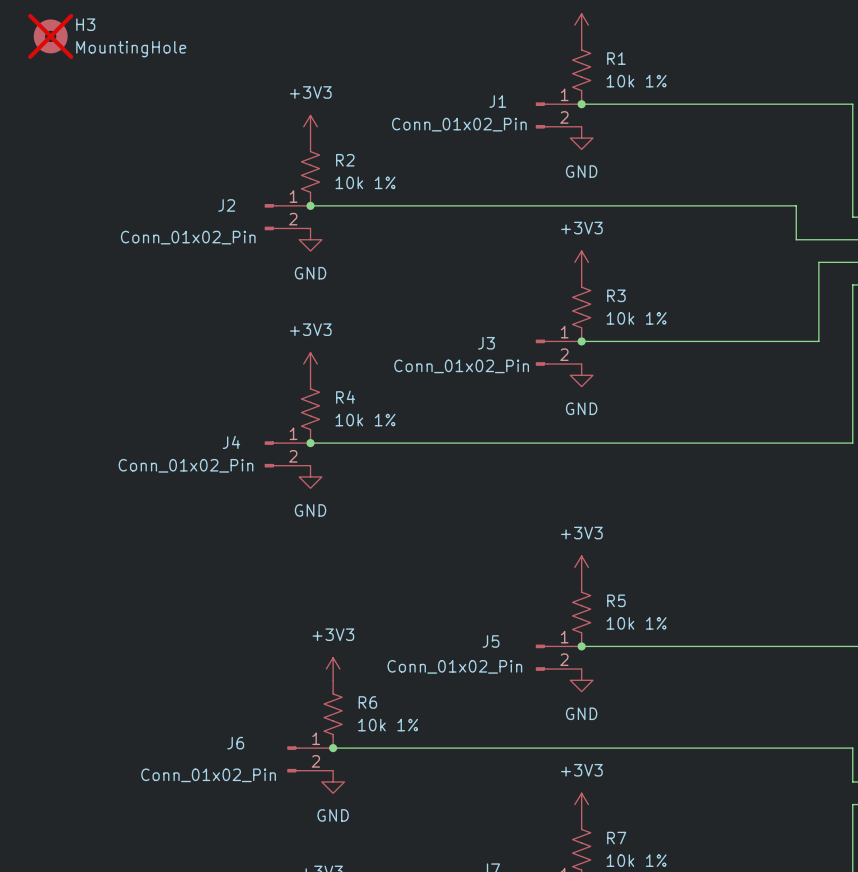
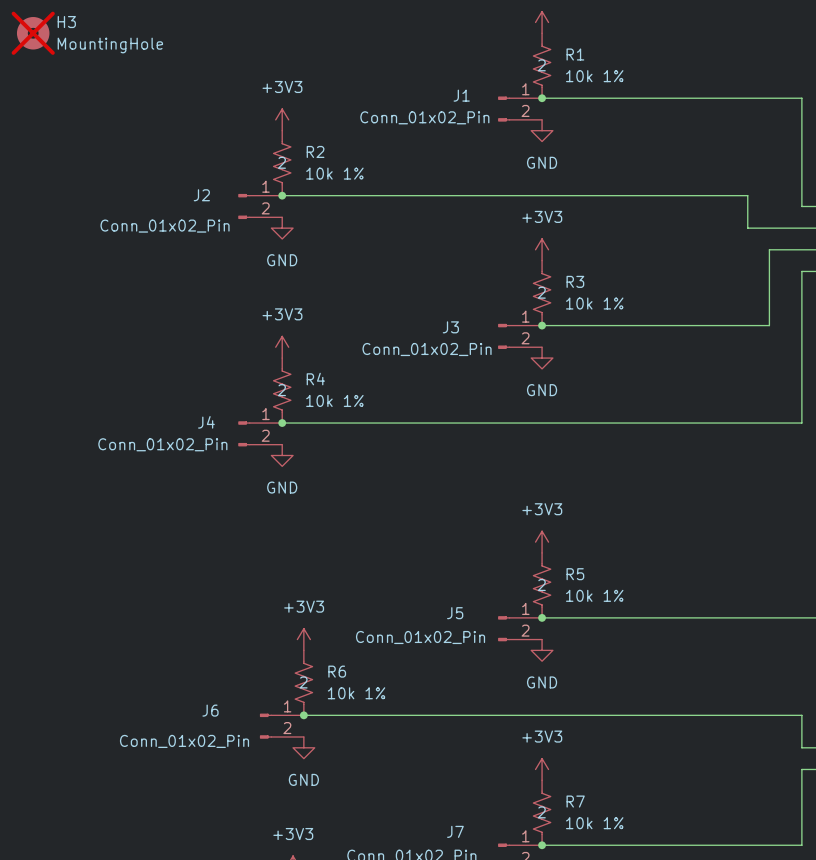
R1 text: none -> 2 (541, 65)
R2 text: none -> 2 (281, 162)
R3 text: none -> 2 (541, 292)
R4 text: none -> 2 (281, 390)
R5 text: none -> 2 (541, 585)
R6 text: none -> 2 (303, 682)
R7 text: none -> 2 (541, 812)

